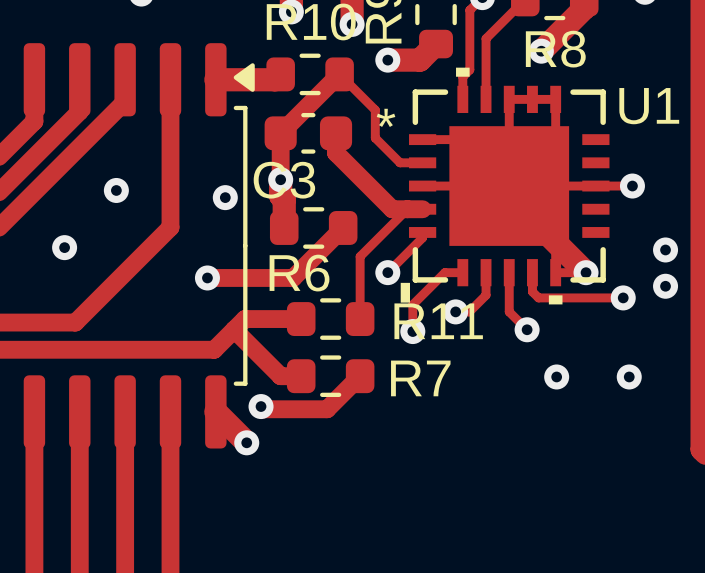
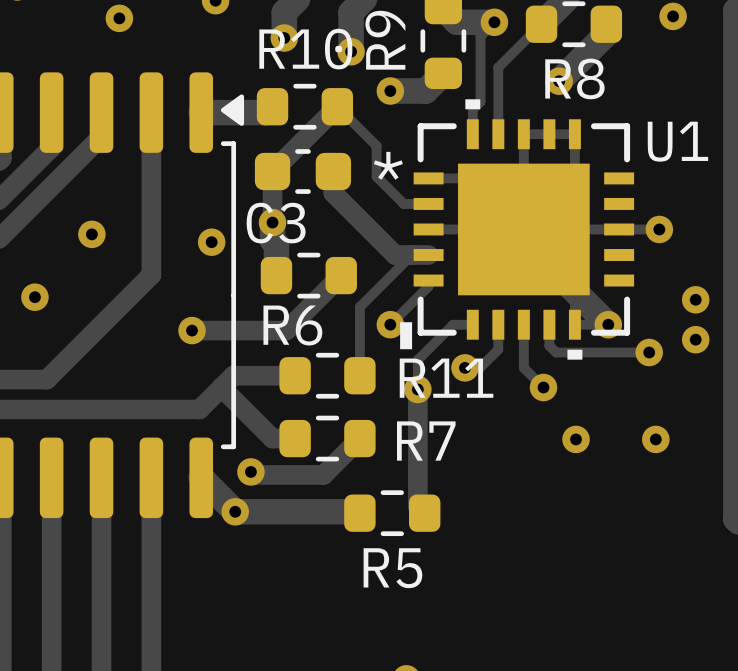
track: none -> (417, 389) (417, 506) (424, 513)
track: none -> (235, 511) (359, 513)
R5: none -> (392, 513)

